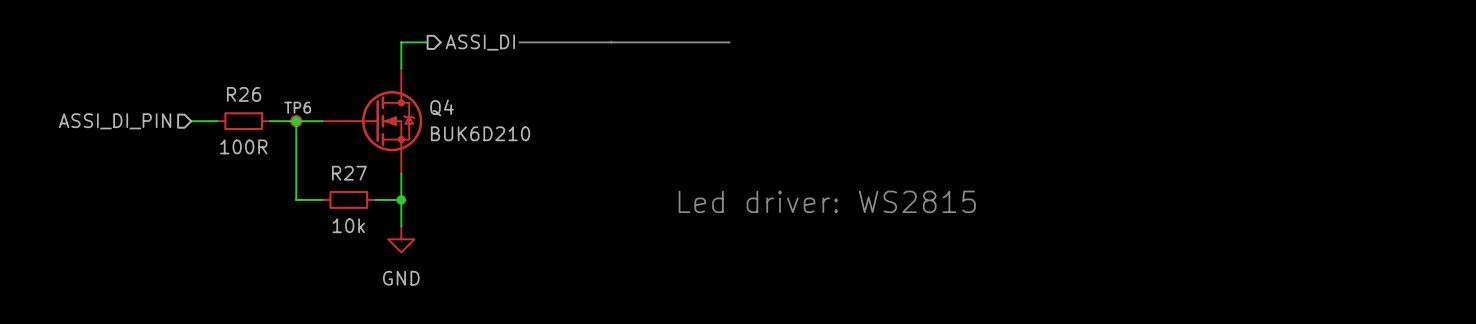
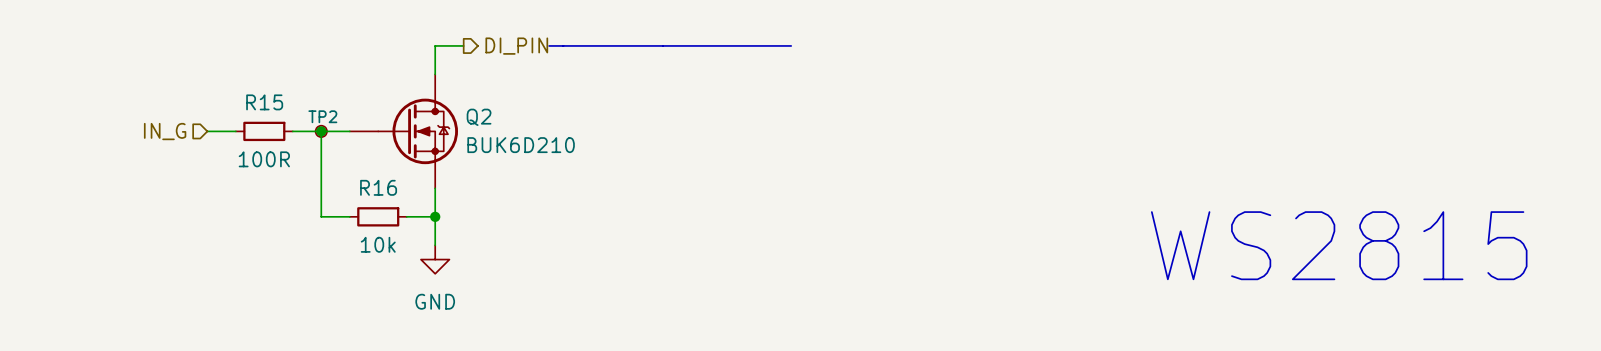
hierarchical label: ASSI_DI (480, 42) -> DI_PIN (516, 46)
line: none -> (549, 45) (563, 45)
R26 name: R26 (244, 94) -> R15 (264, 102)
TP6 name: TP6 (297, 107) -> TP2 (322, 116)
Q4 name: Q4 (442, 107) -> Q2 (479, 117)
hierarchical label: ASSI_DI_PIN (115, 121) -> IN_G (165, 131)
R27 name: R27 (349, 173) -> R16 (378, 187)
text: Led driver: WS2815 (827, 201) -> none
text: none -> WS2815 (1339, 245)

